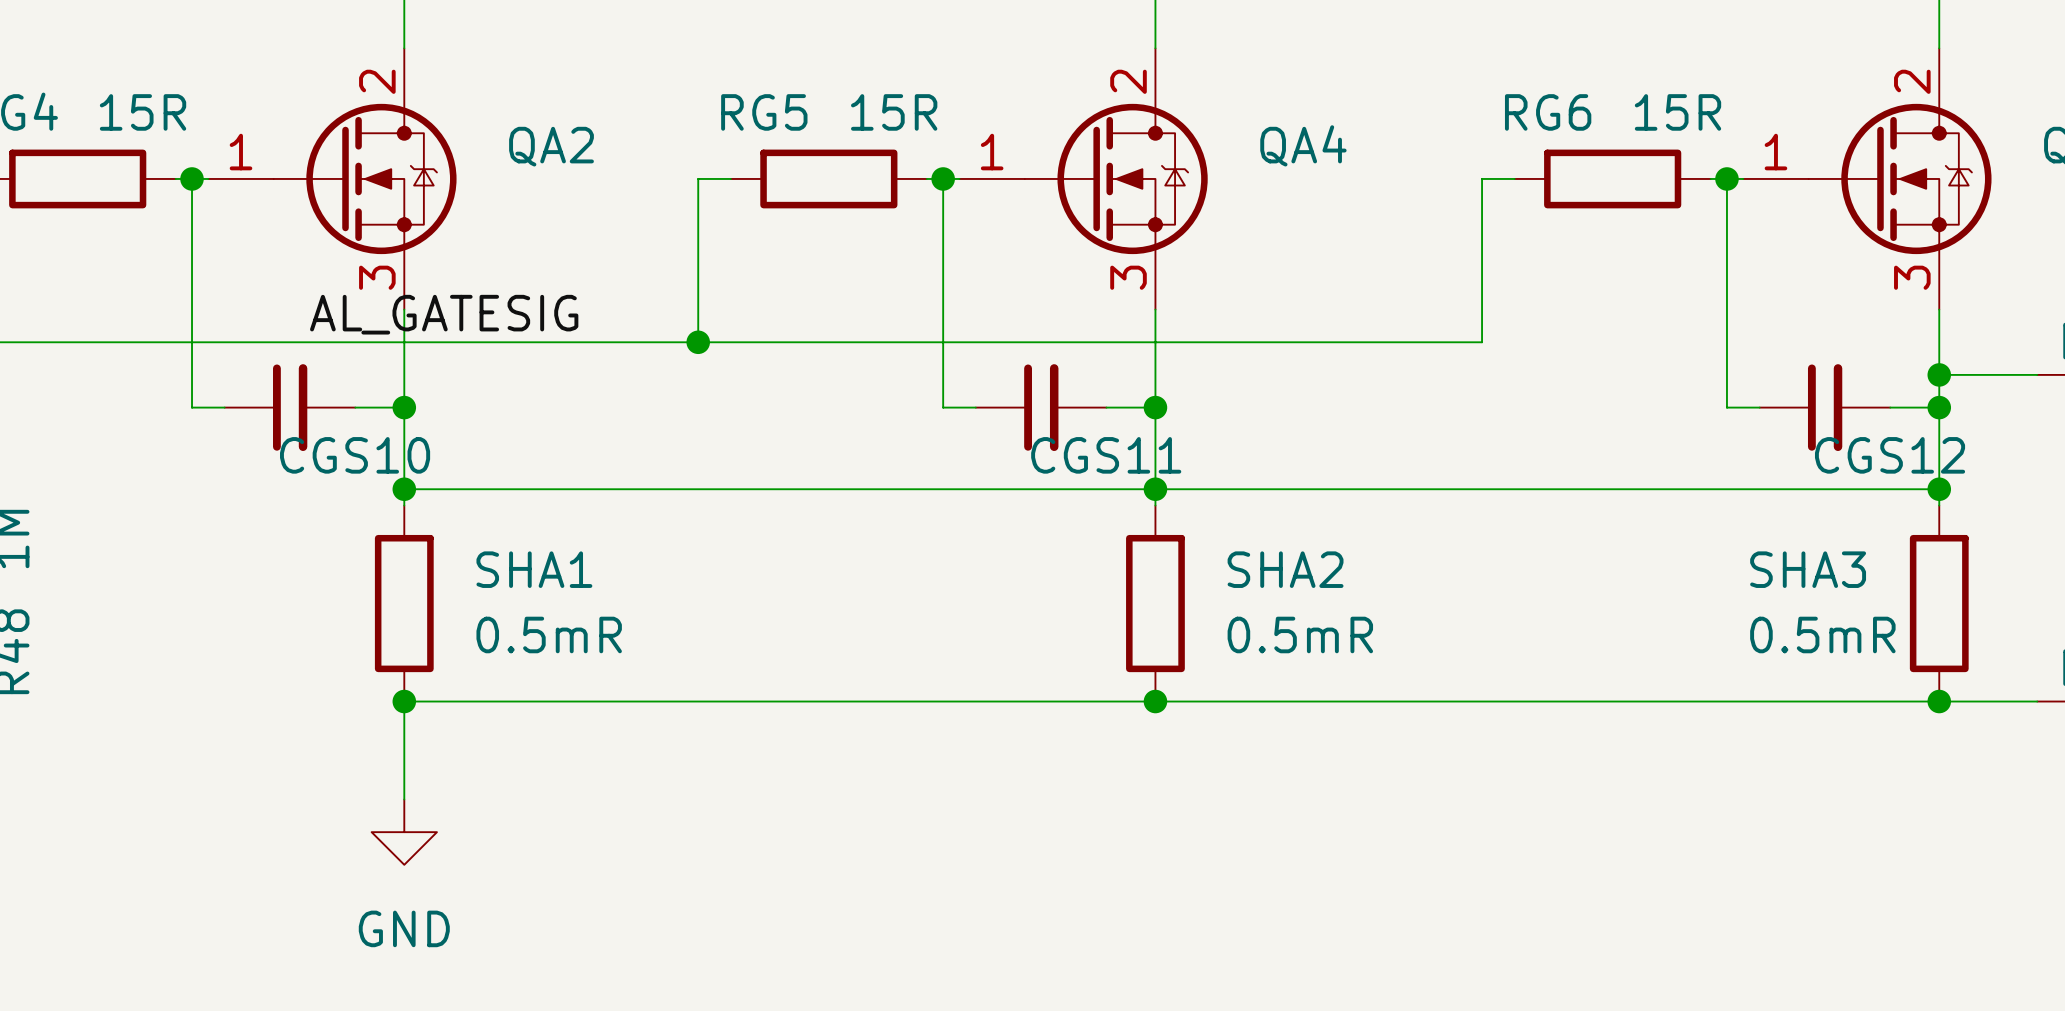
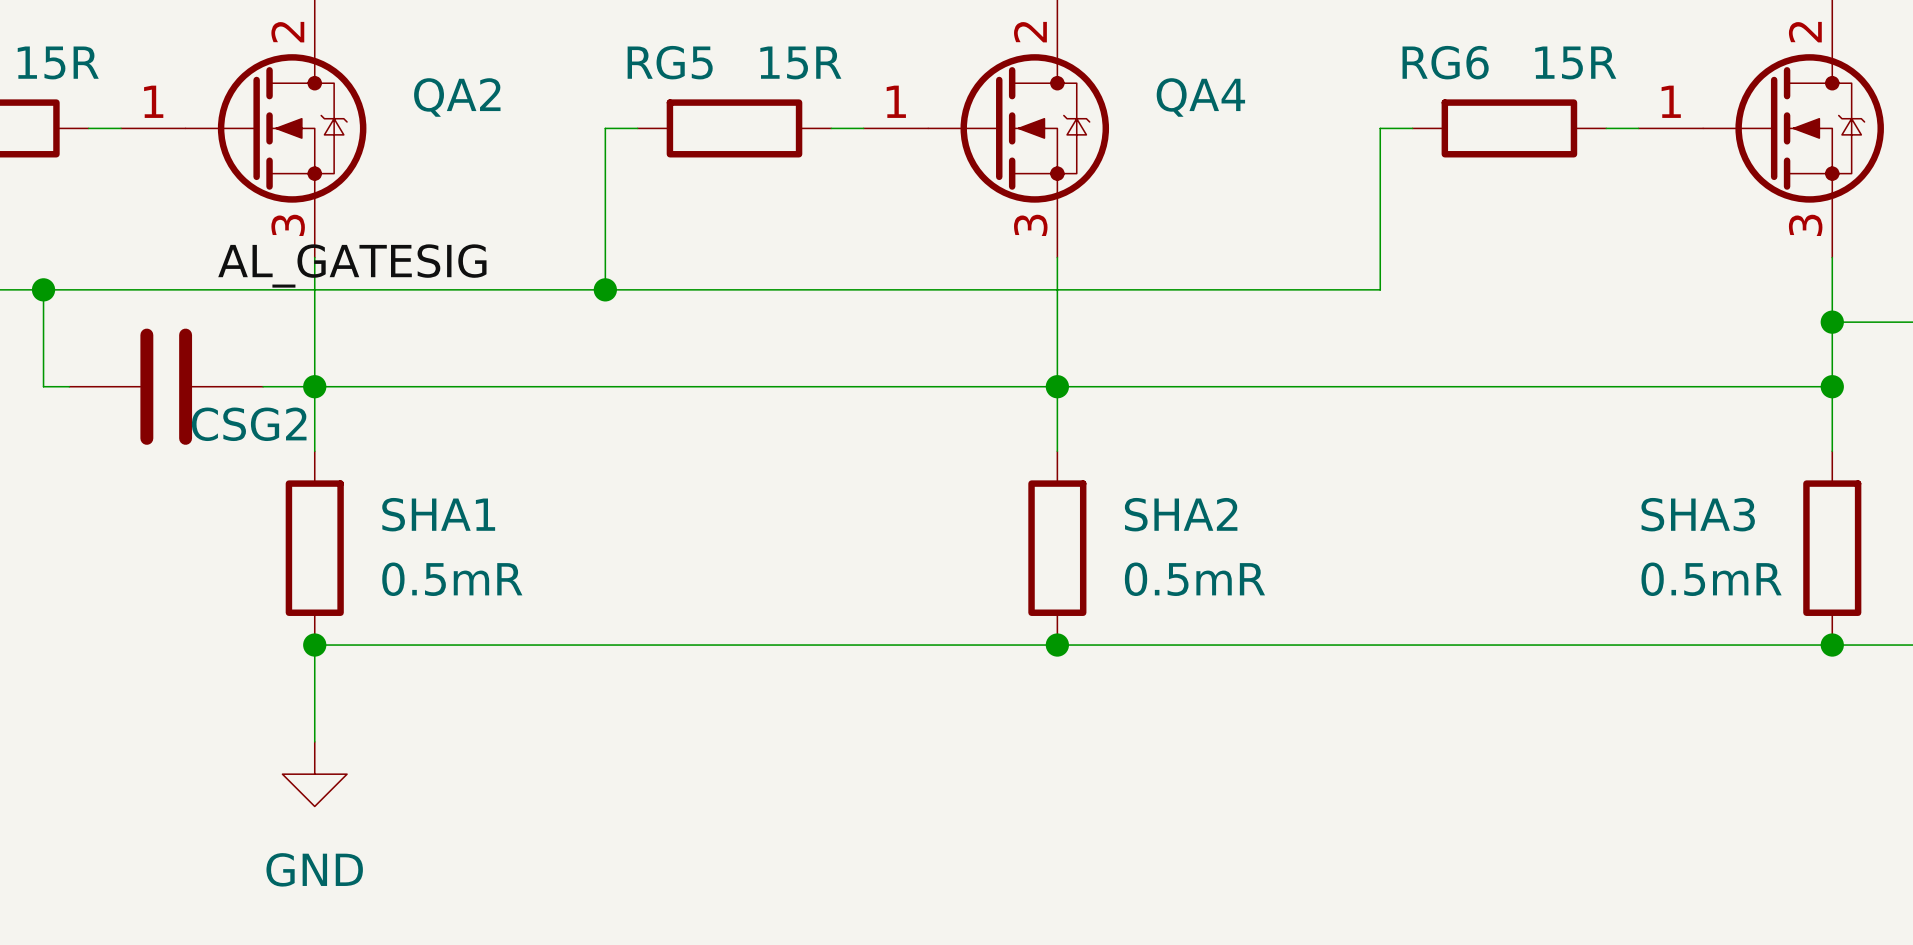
wire: (192, 178) (192, 407) (224, 407) -> none
junction: (192, 178) -> none
wire: (943, 178) (943, 407) (975, 407) -> none
junction: (943, 178) -> none
wire: (1726, 178) (1726, 407) (1759, 407) -> none
junction: (1726, 178) -> none
wire: none -> (43, 289) (43, 386) (69, 386)
junction: none -> (43, 289)
CGS10: (289, 407) -> none
wire: (355, 407) (404, 407) -> none
junction: (404, 407) -> none
CGS11: (1041, 407) -> none
wire: (1106, 407) (1155, 407) -> none
junction: (1155, 407) -> none
CGS12: (1824, 407) -> none
wire: (1890, 407) (1939, 407) -> none
junction: (1939, 407) -> none
CSG2: none -> (166, 386)
wire: none -> (263, 386) (1832, 386)
junction: none -> (314, 386)
junction: none -> (1057, 386)
junction: none -> (1832, 386)
wire: (404, 489) (1939, 489) -> none
junction: (404, 489) -> none
junction: (1155, 489) -> none
junction: (1939, 489) -> none

